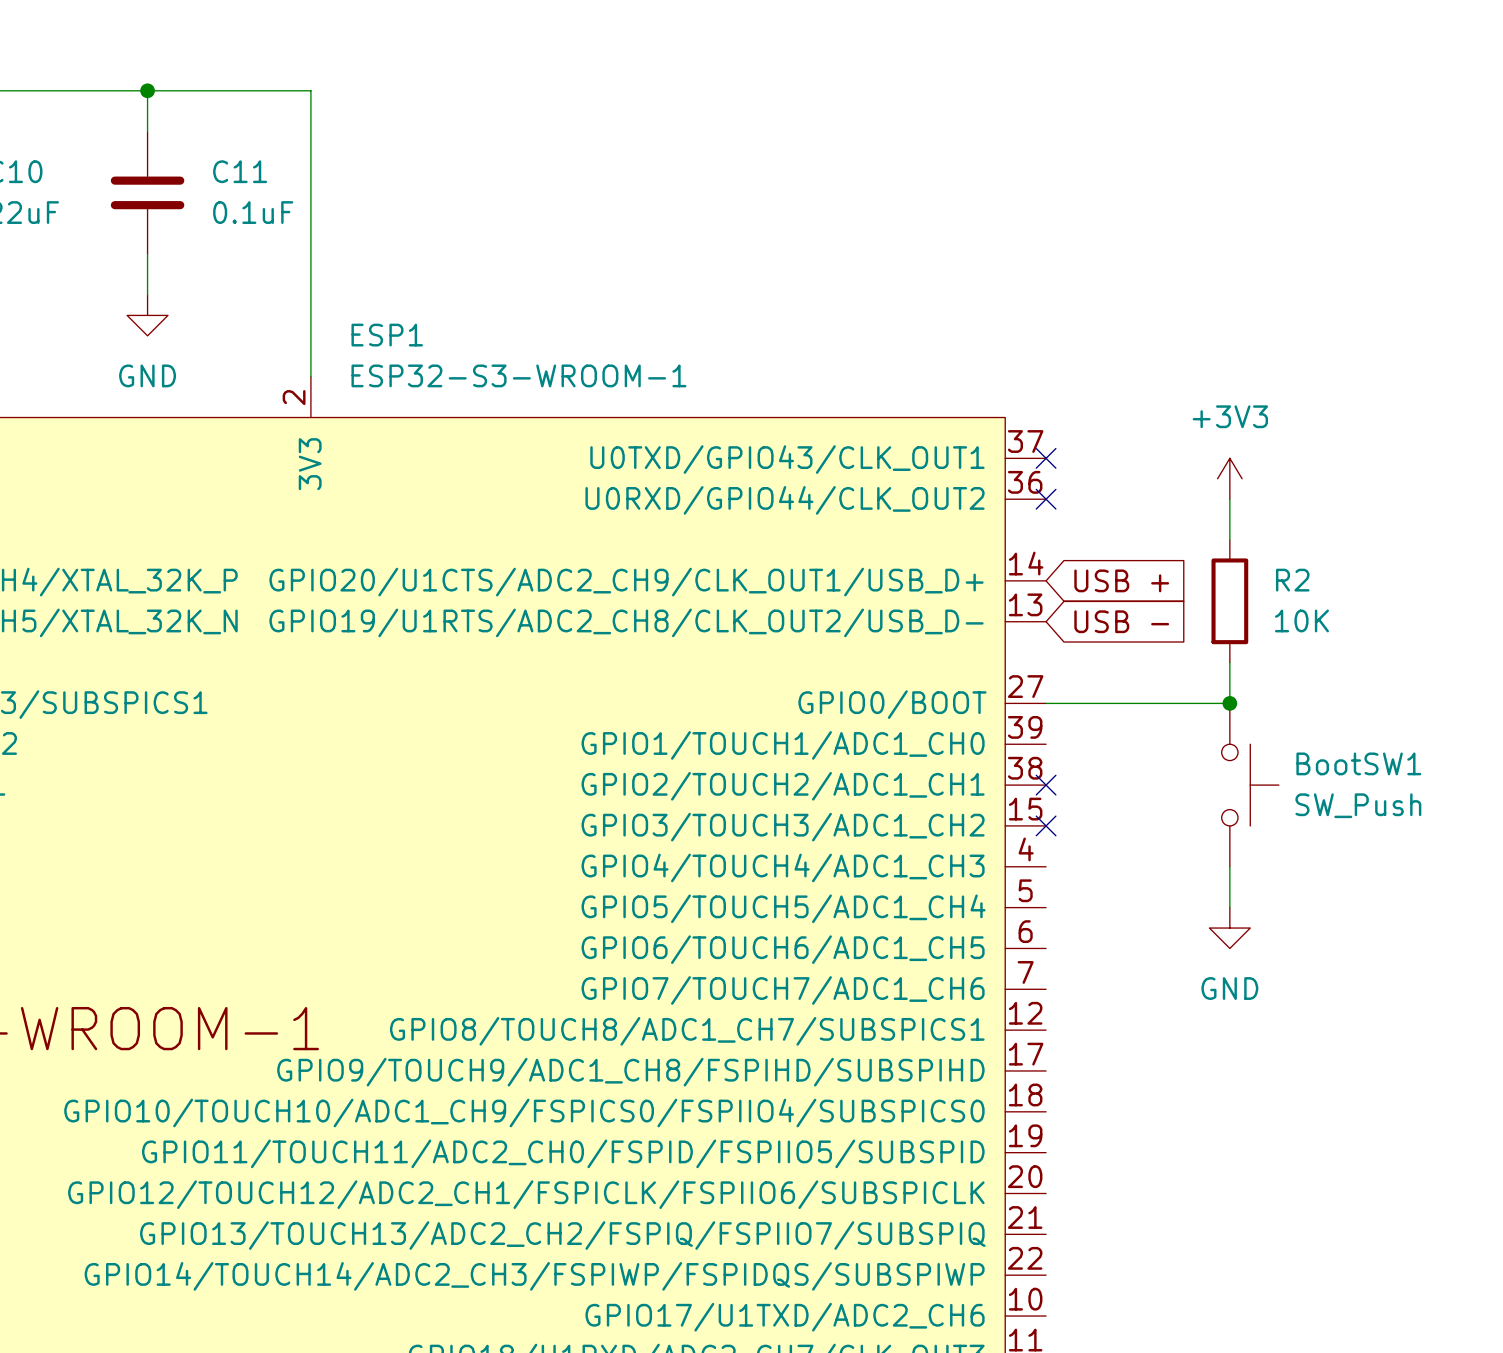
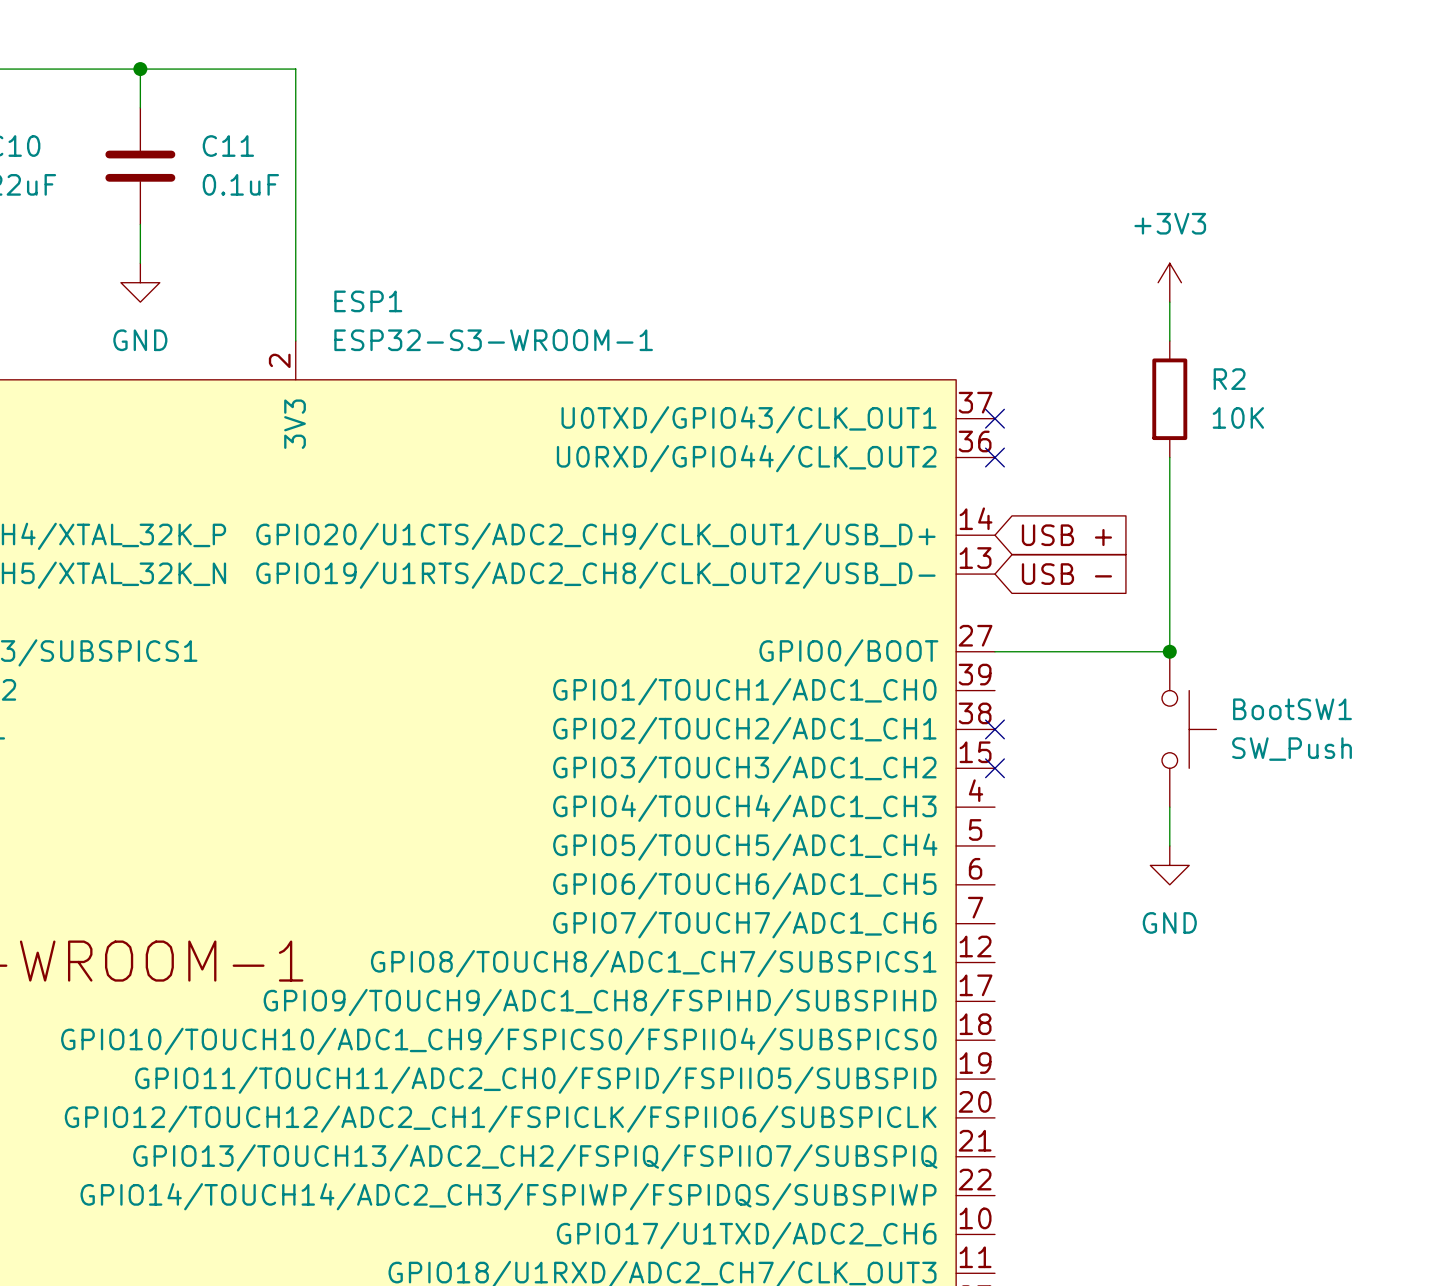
wire: none -> (1169, 302) (1169, 340)
power symbol position: +3V3 (1229, 478) -> +3V3 (1169, 282)
wire: none -> (1169, 496) (1169, 612)
R2 position: (1229, 601) -> (1169, 399)

